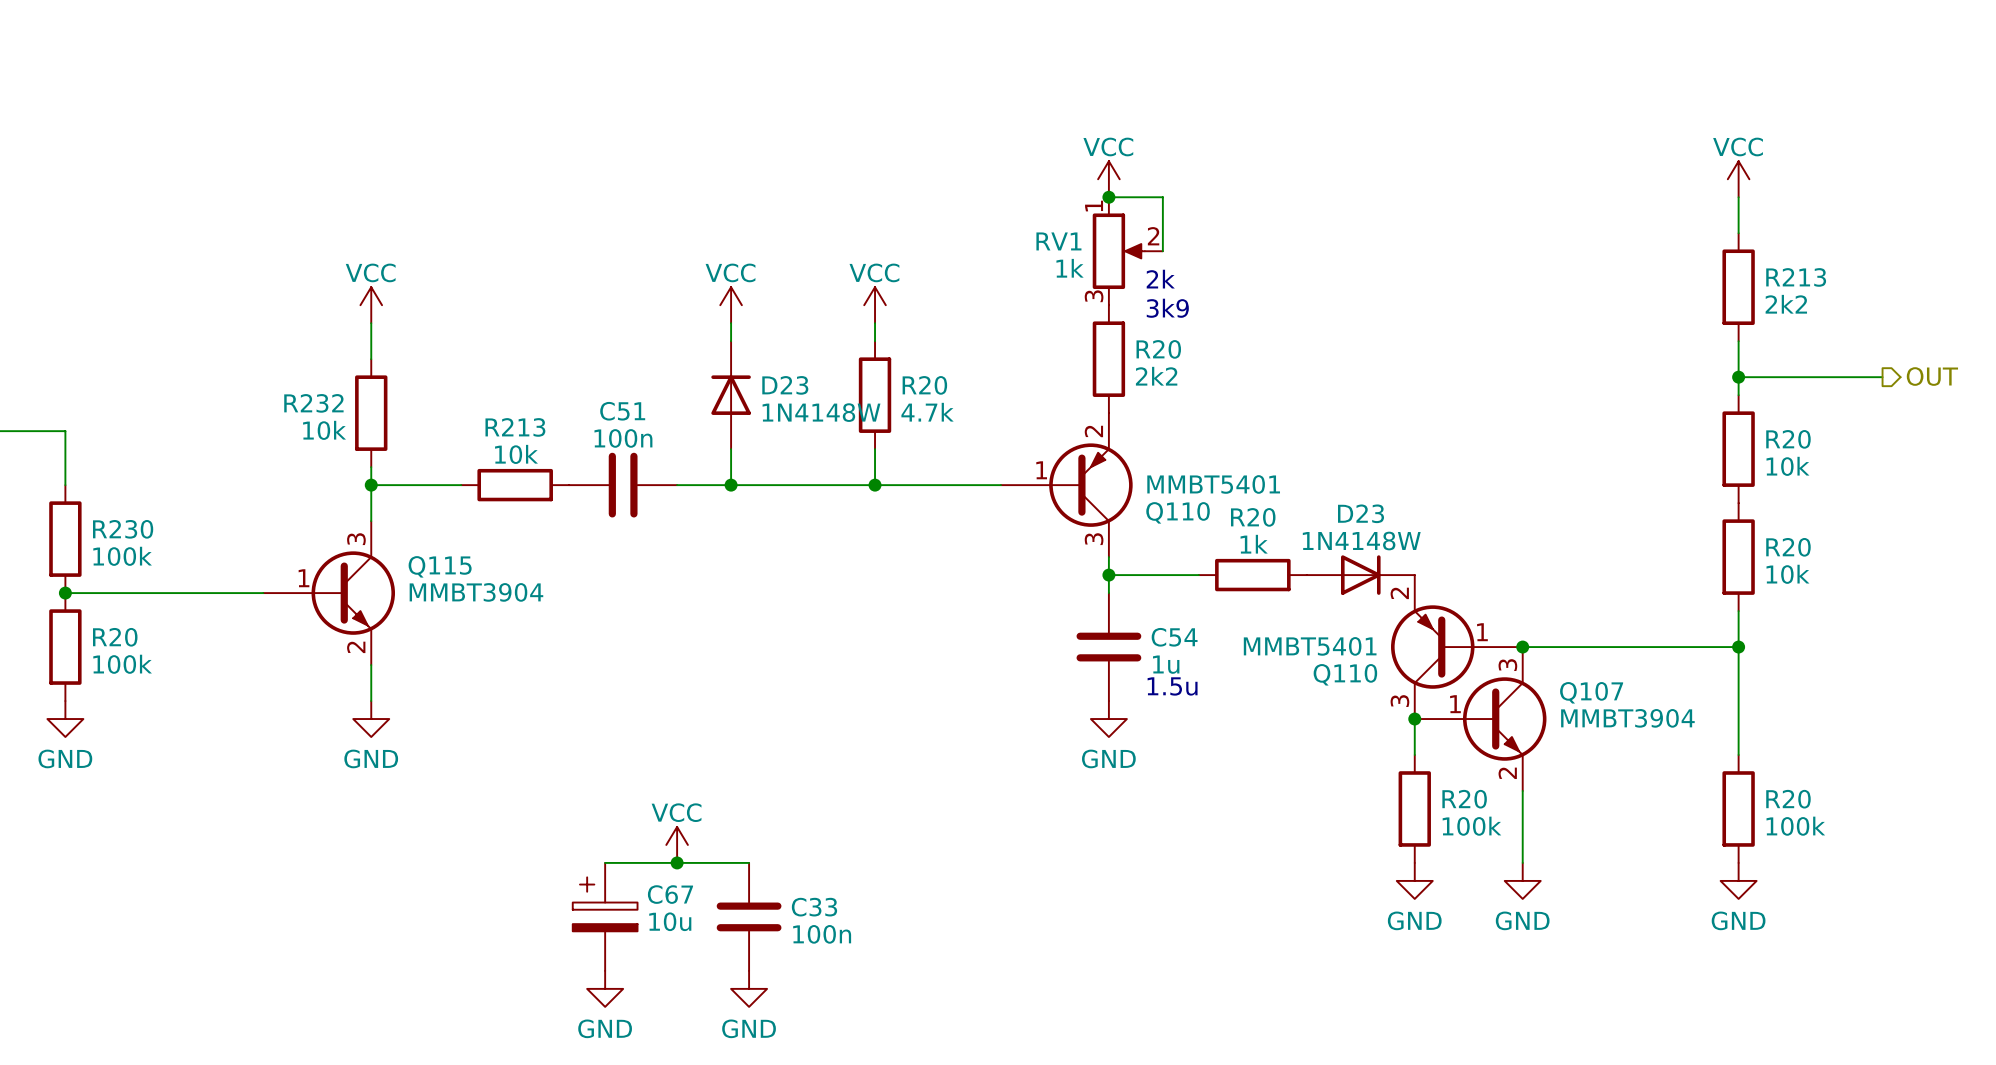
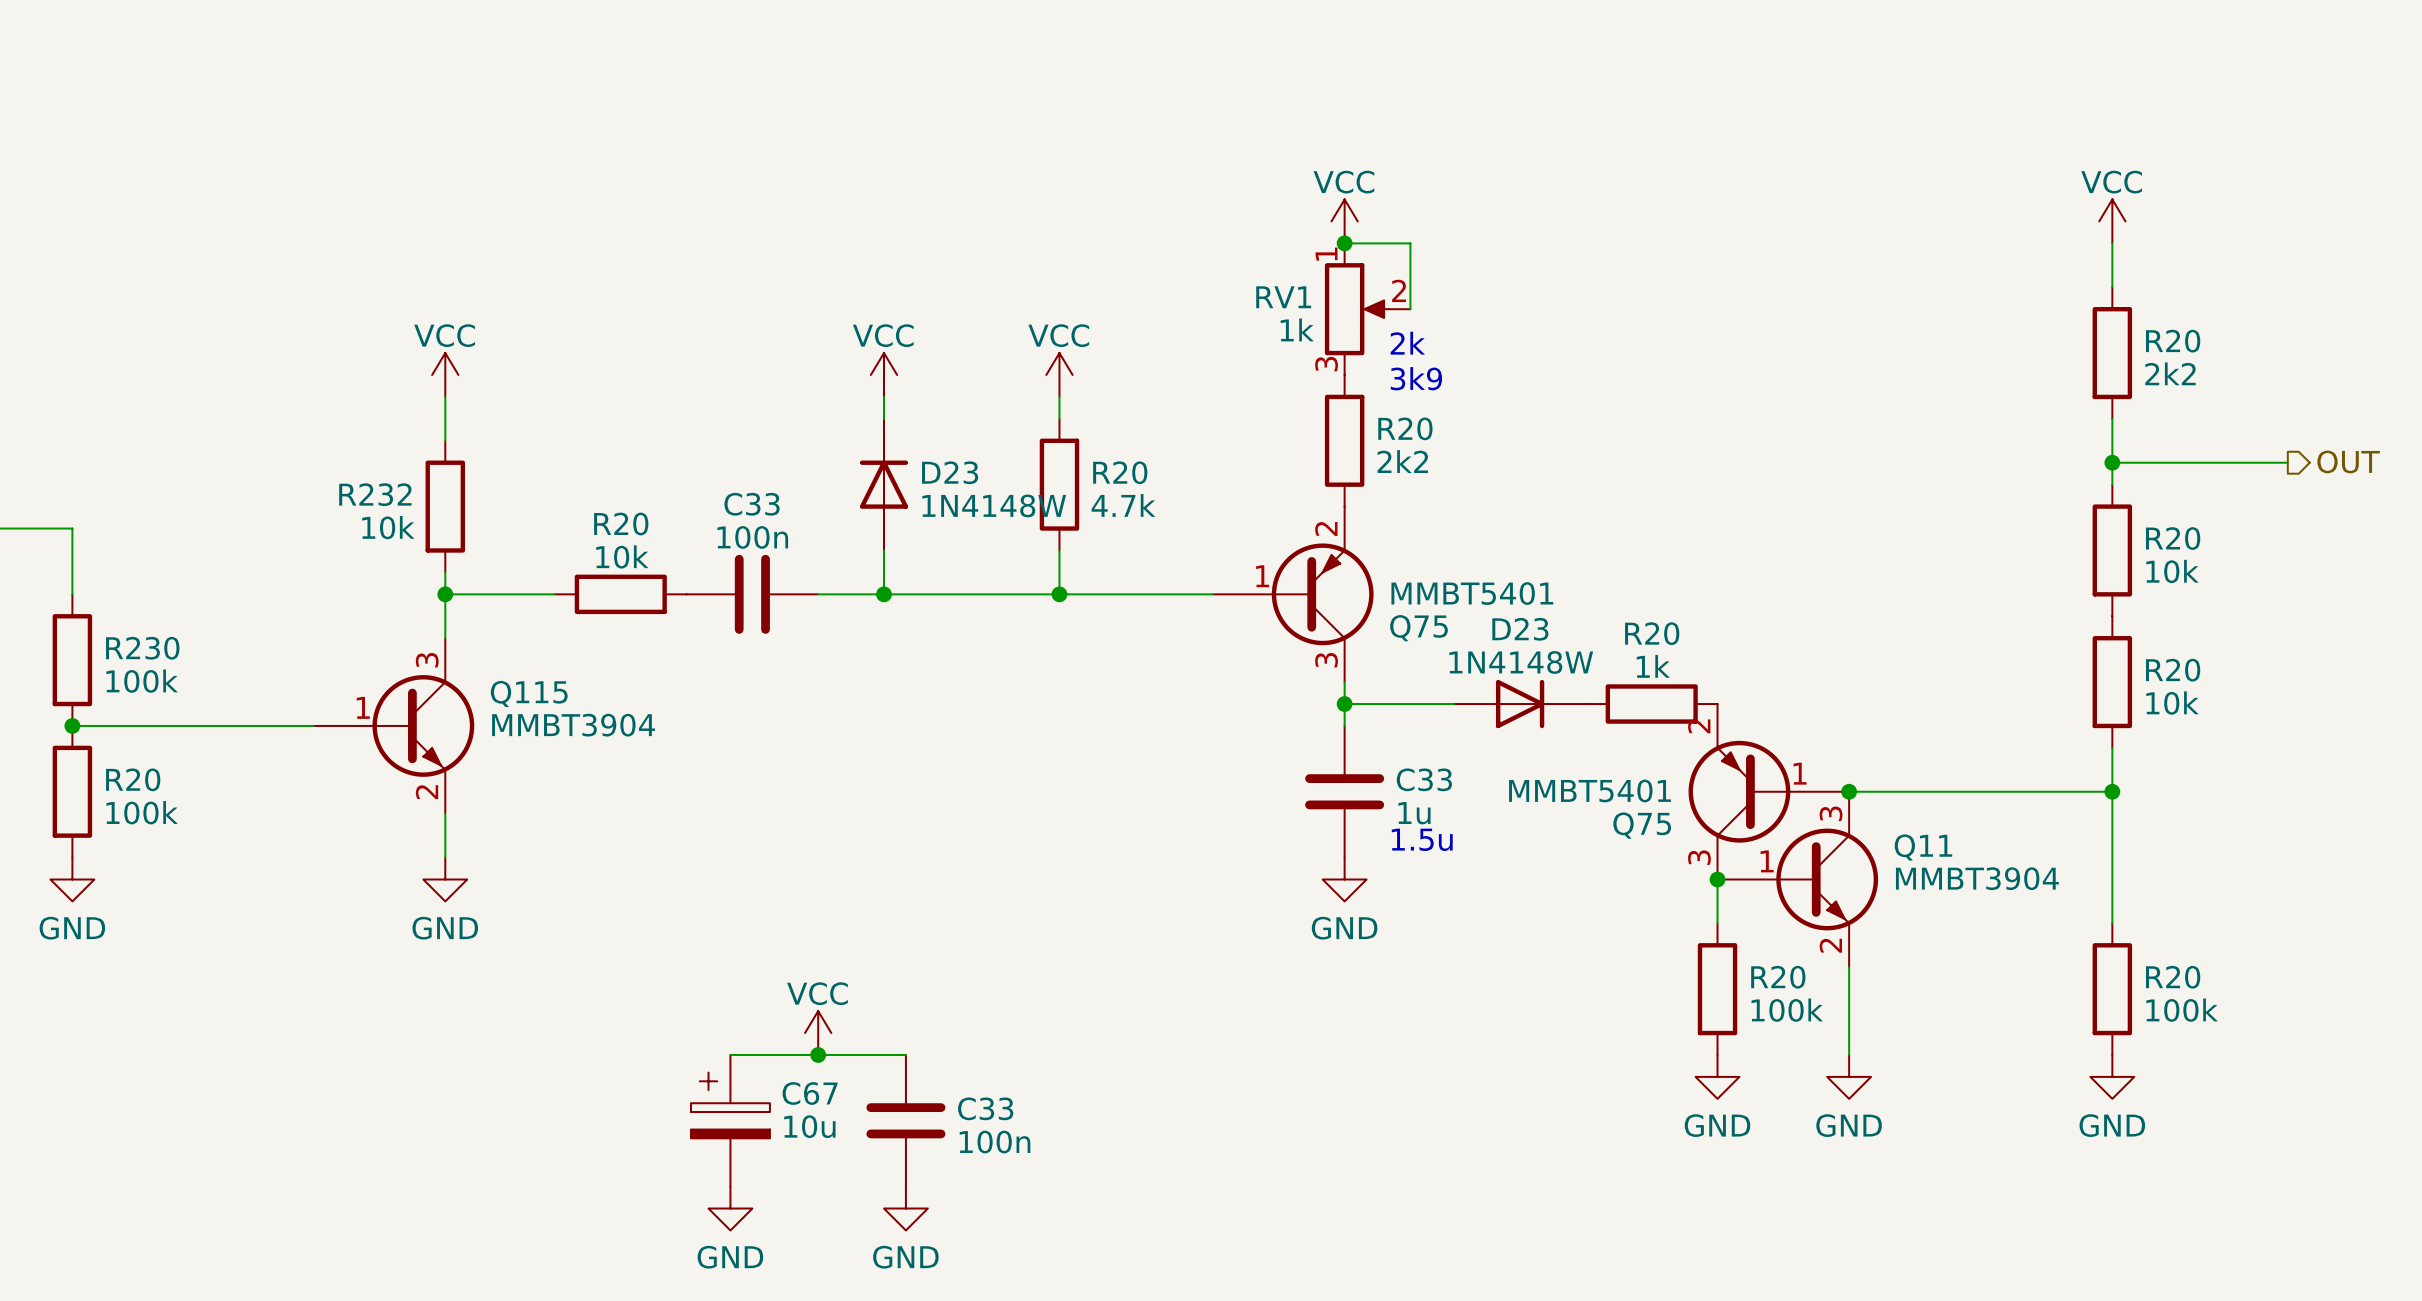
R213 name: R213 (1796, 277) -> R20 (2173, 341)
C51 name: C51 (622, 411) -> C33 (752, 504)
R213 name: R213 (515, 427) -> R20 (621, 524)
Q110 name: Q110 (1178, 512) -> Q75 (1419, 628)
R20 position: (1252, 575) -> (1651, 704)
D23 position: (1360, 575) -> (1520, 704)
C54 name: C54 (1174, 637) -> C33 (1424, 779)
Q110 name: Q110 (1345, 674) -> Q75 (1642, 825)
Q107 name: Q107 (1591, 692) -> Q11 (1923, 847)

